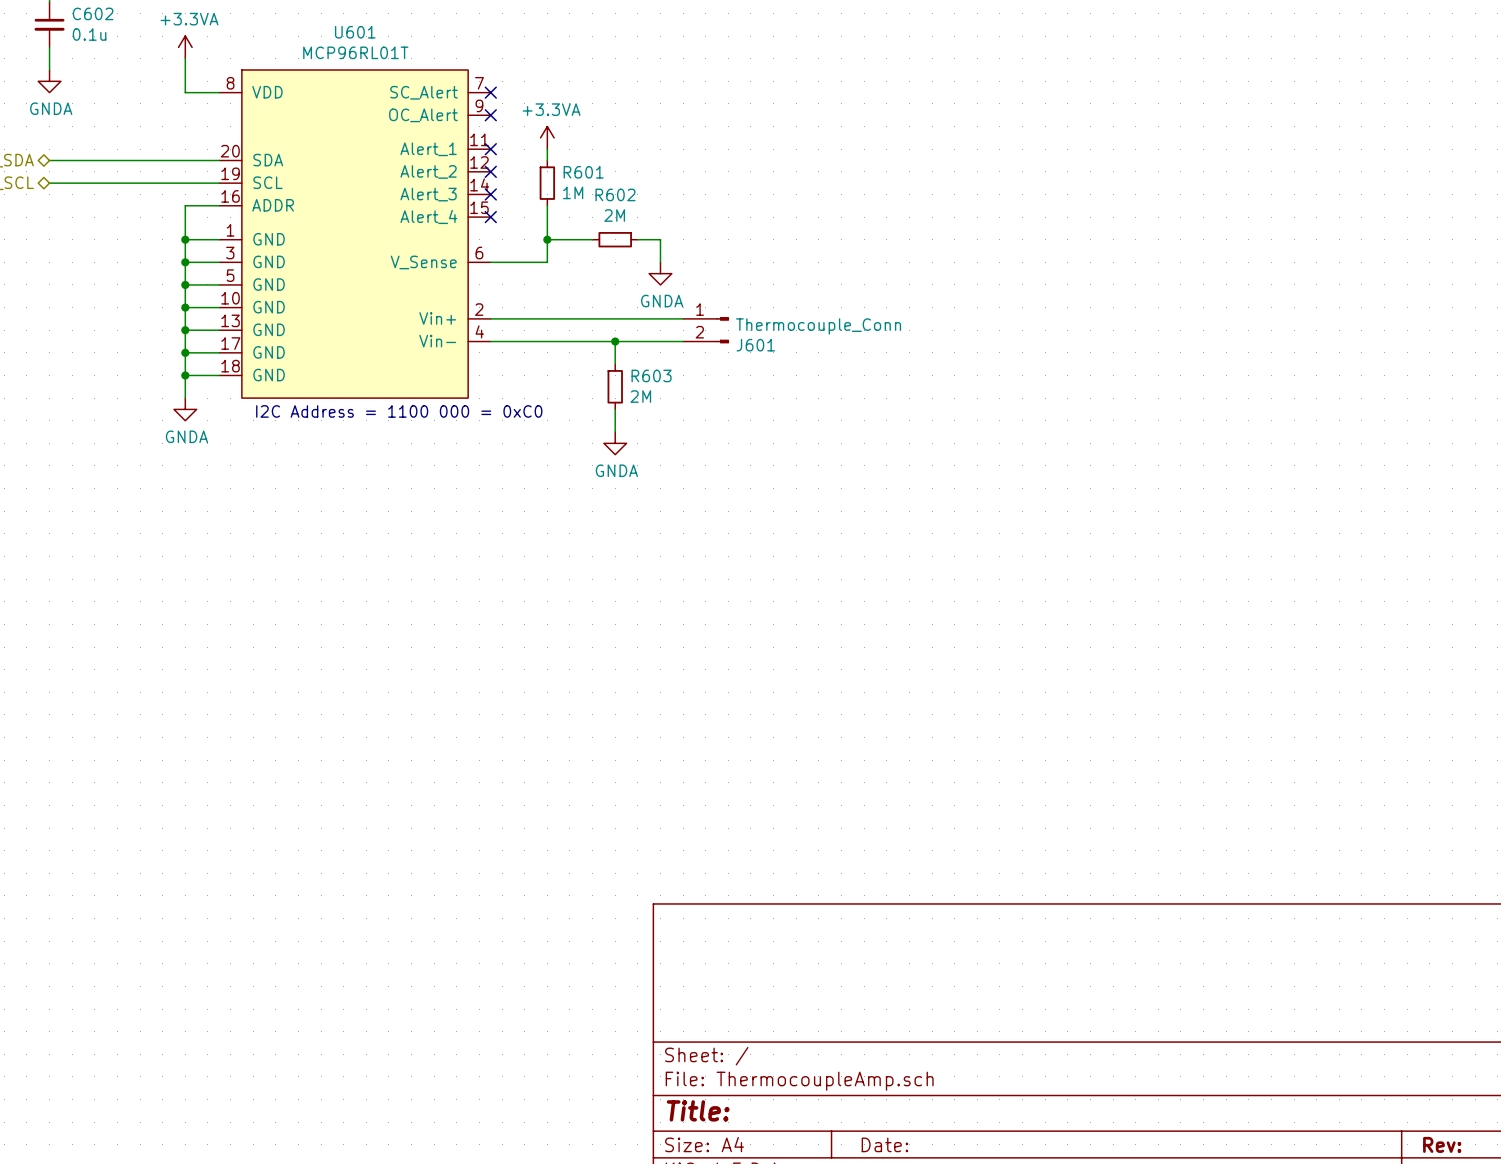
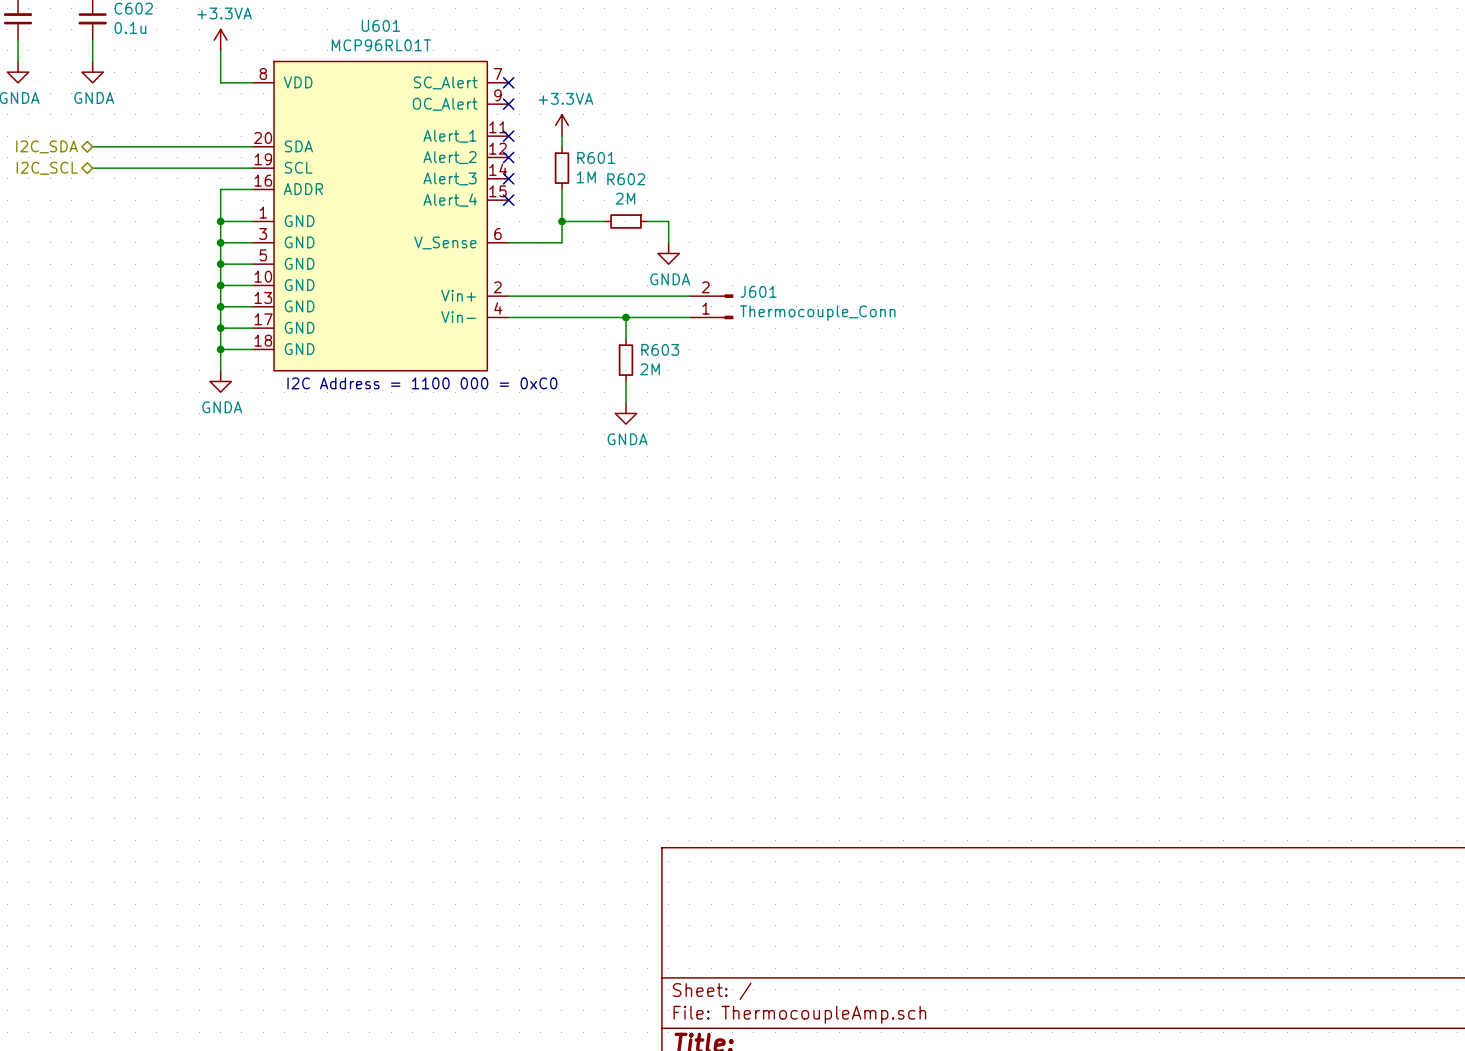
J601 flip: as is (722, 330) -> up-down (727, 306)

